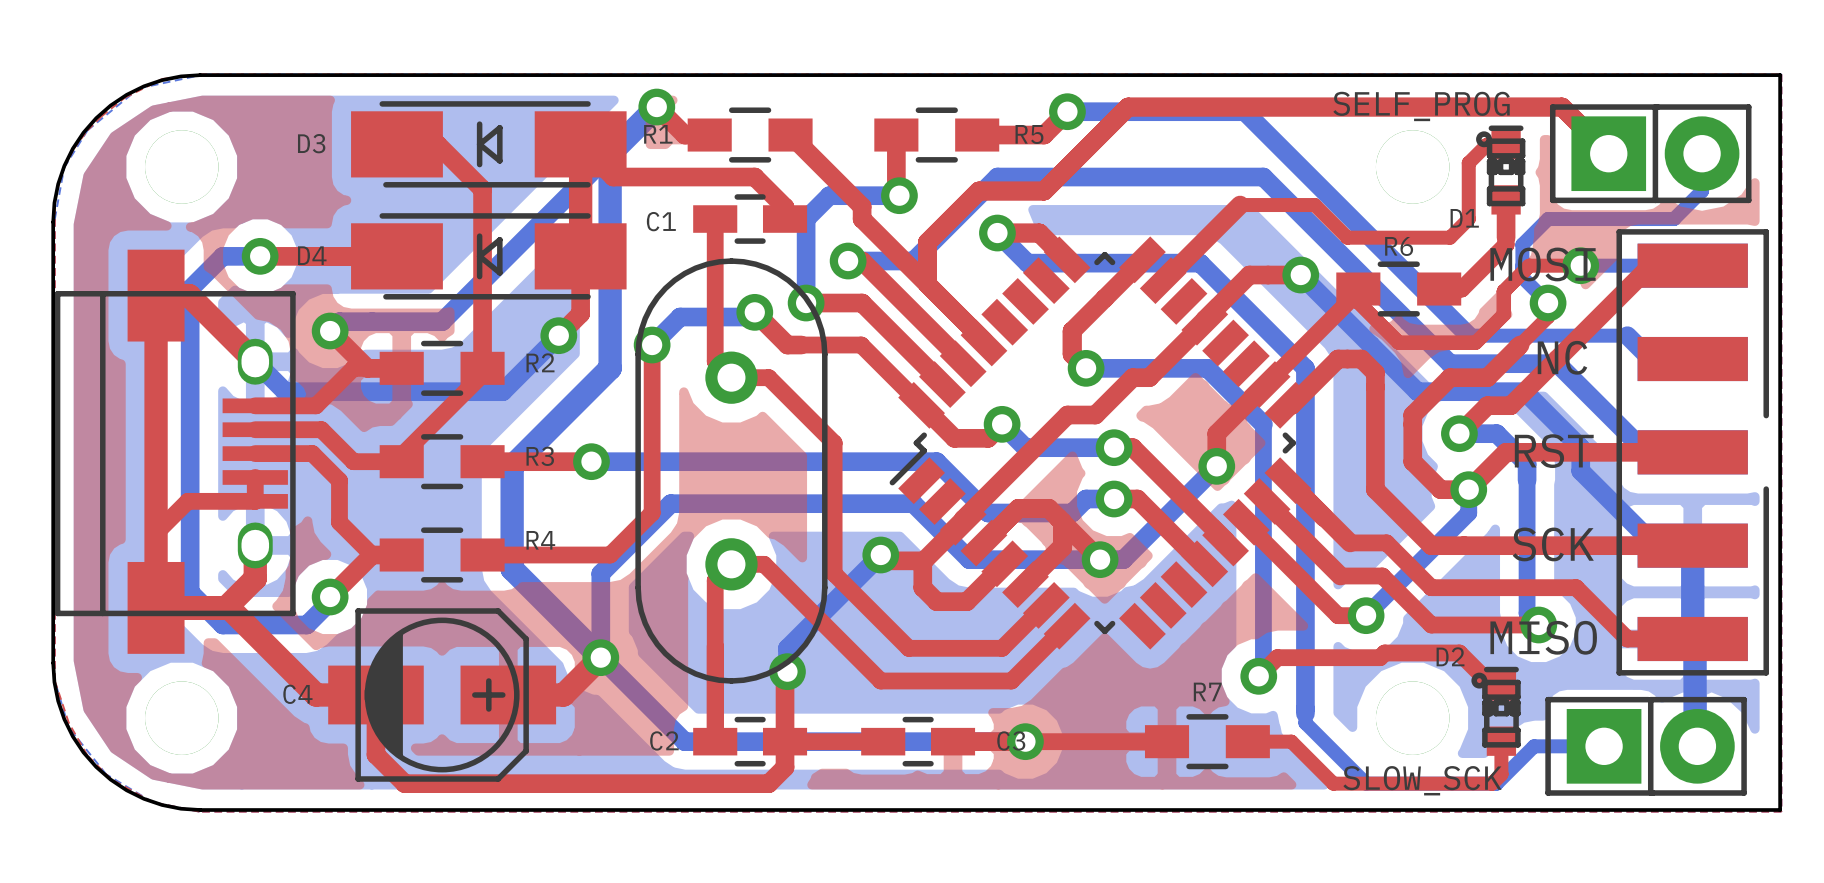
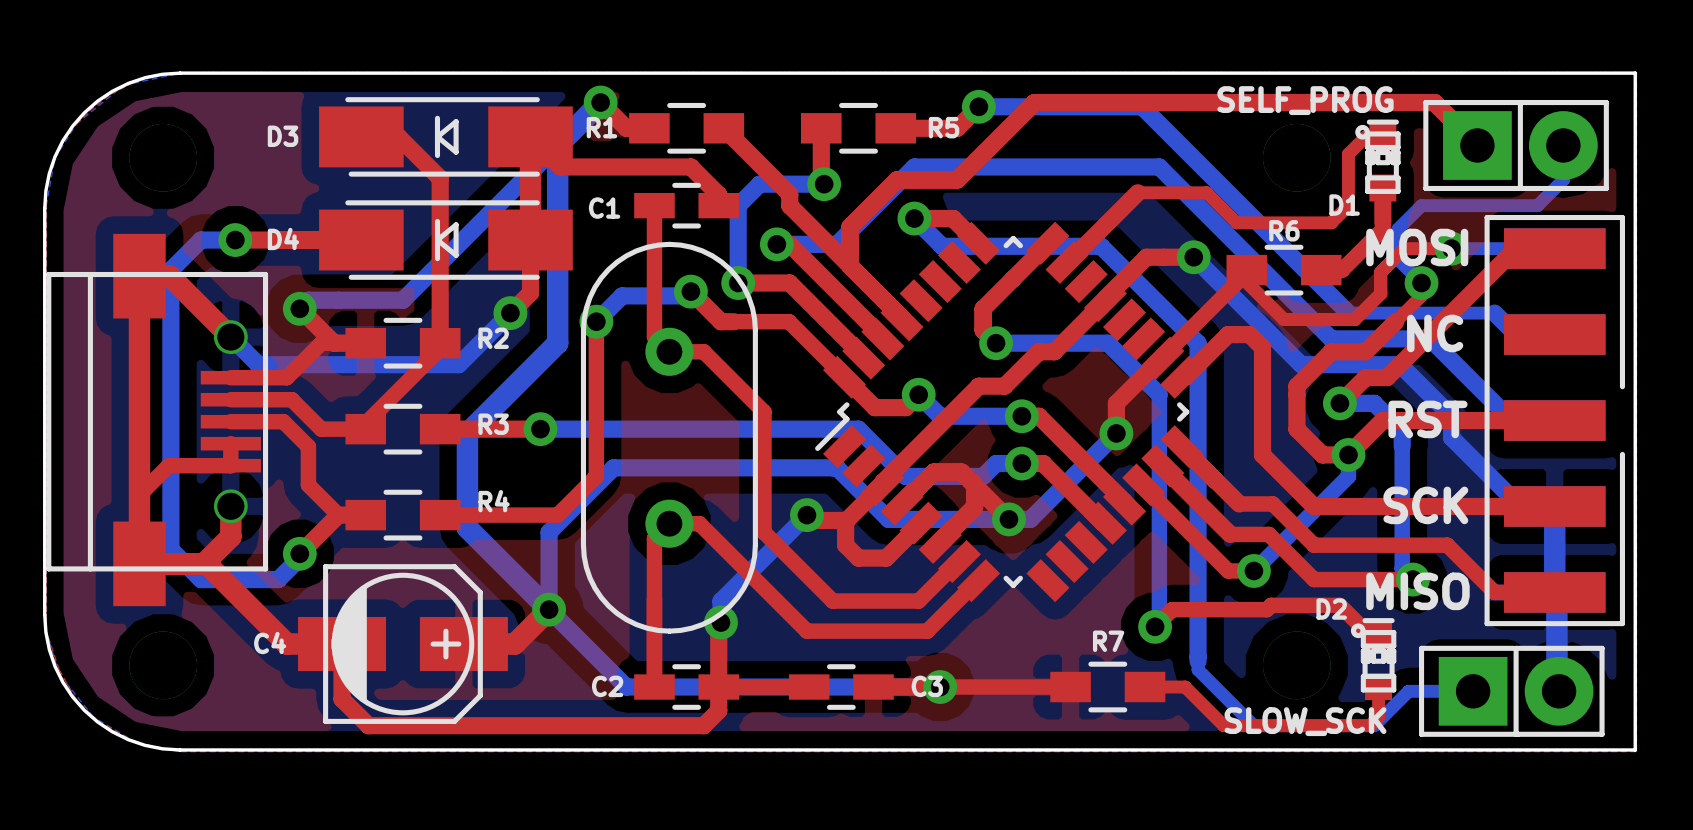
part footprint: [54, 249, 296, 654] -> [46, 233, 269, 607]

